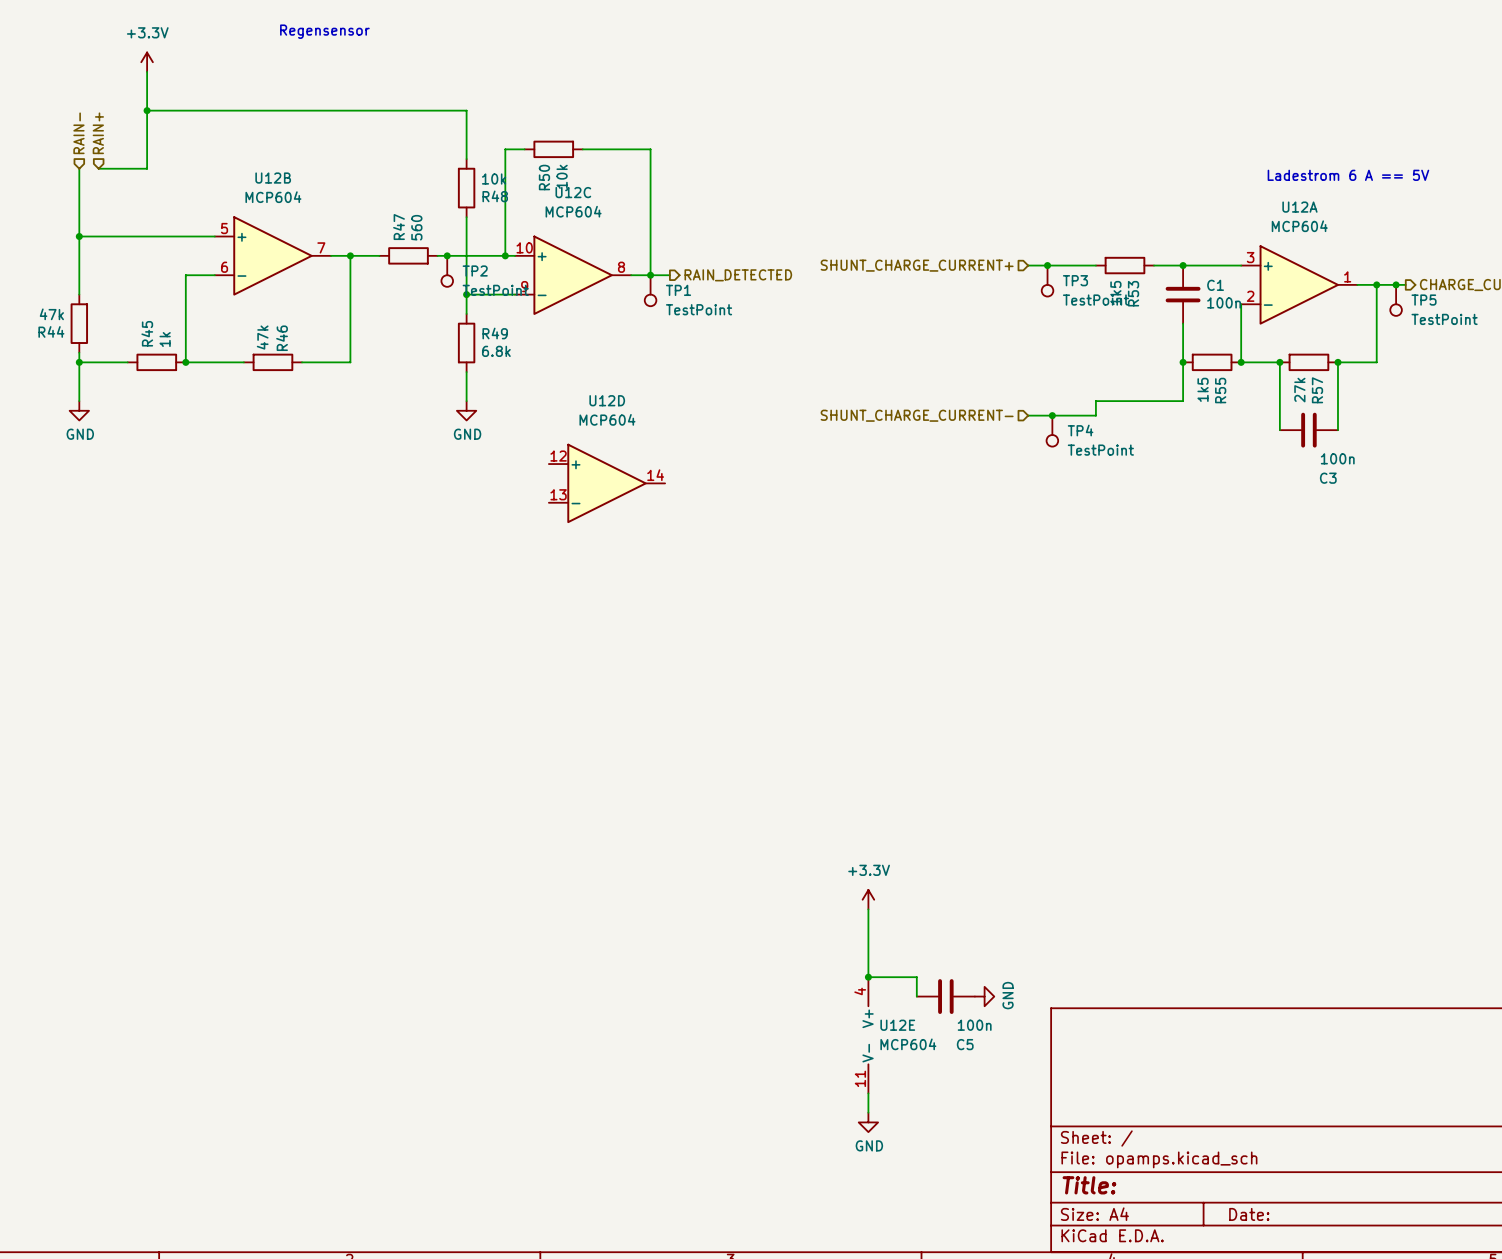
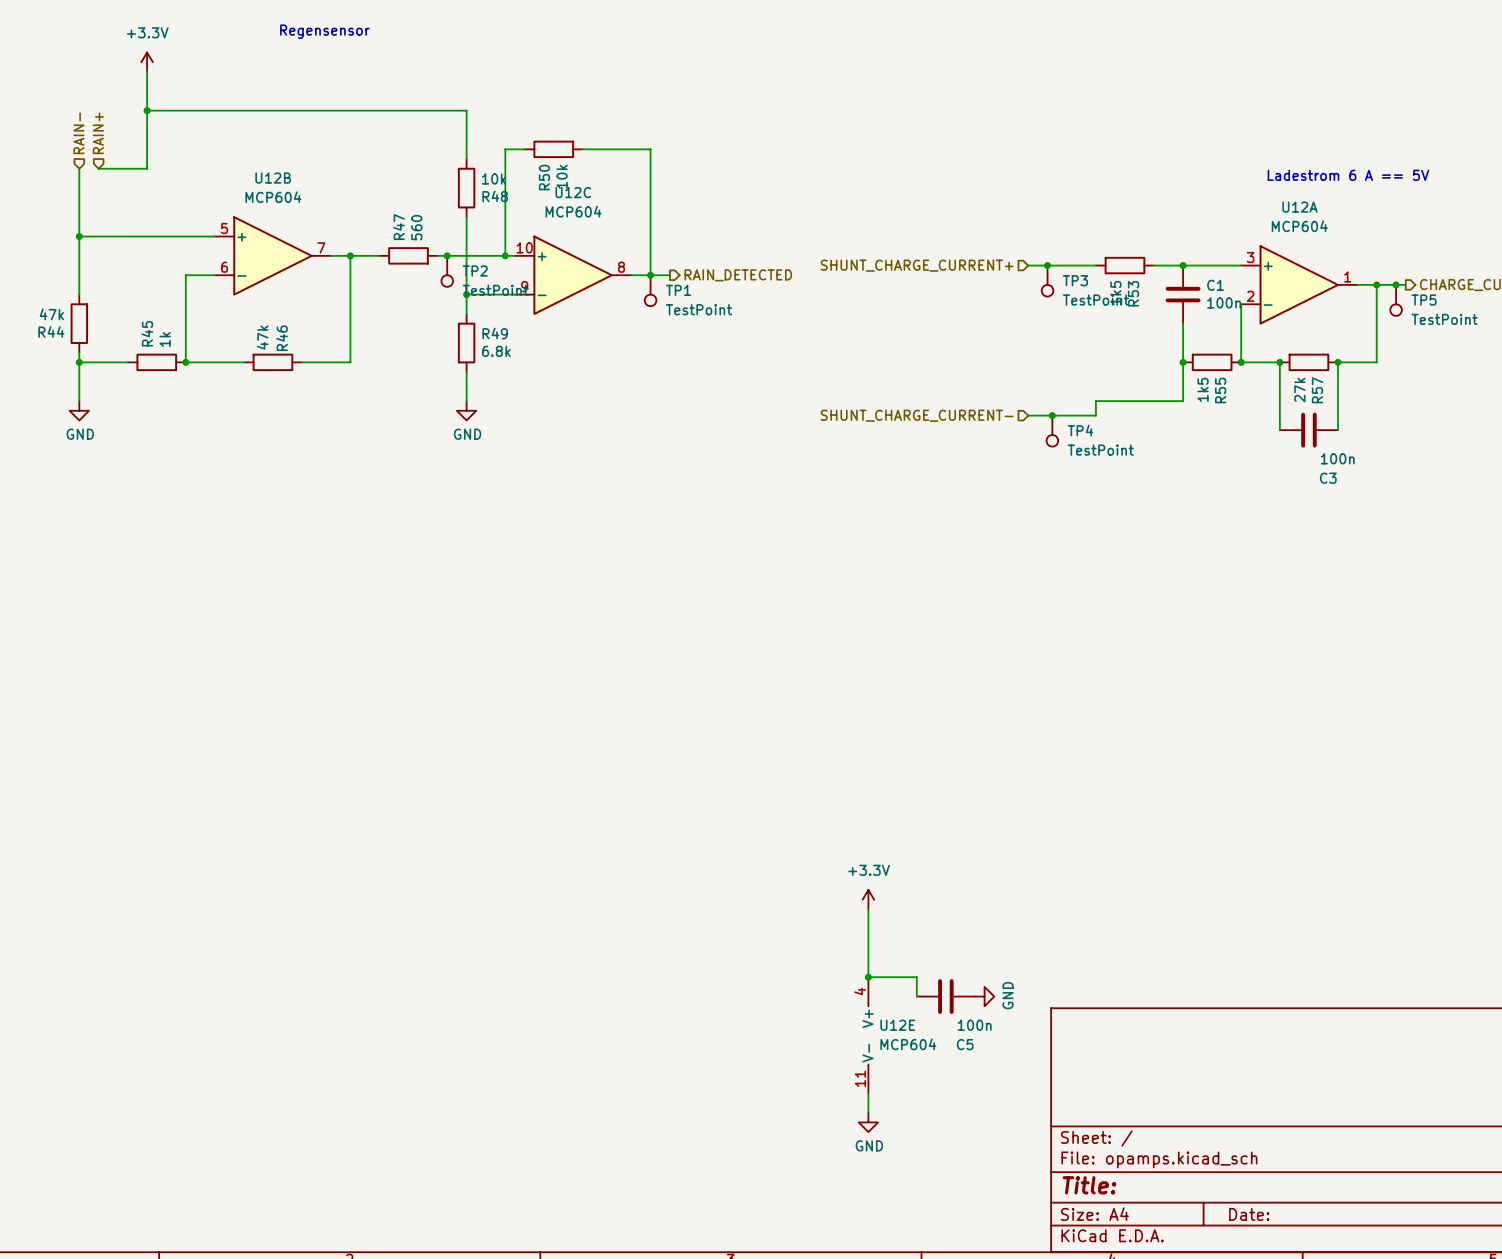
U12D: MCP604 (606, 483) -> none

